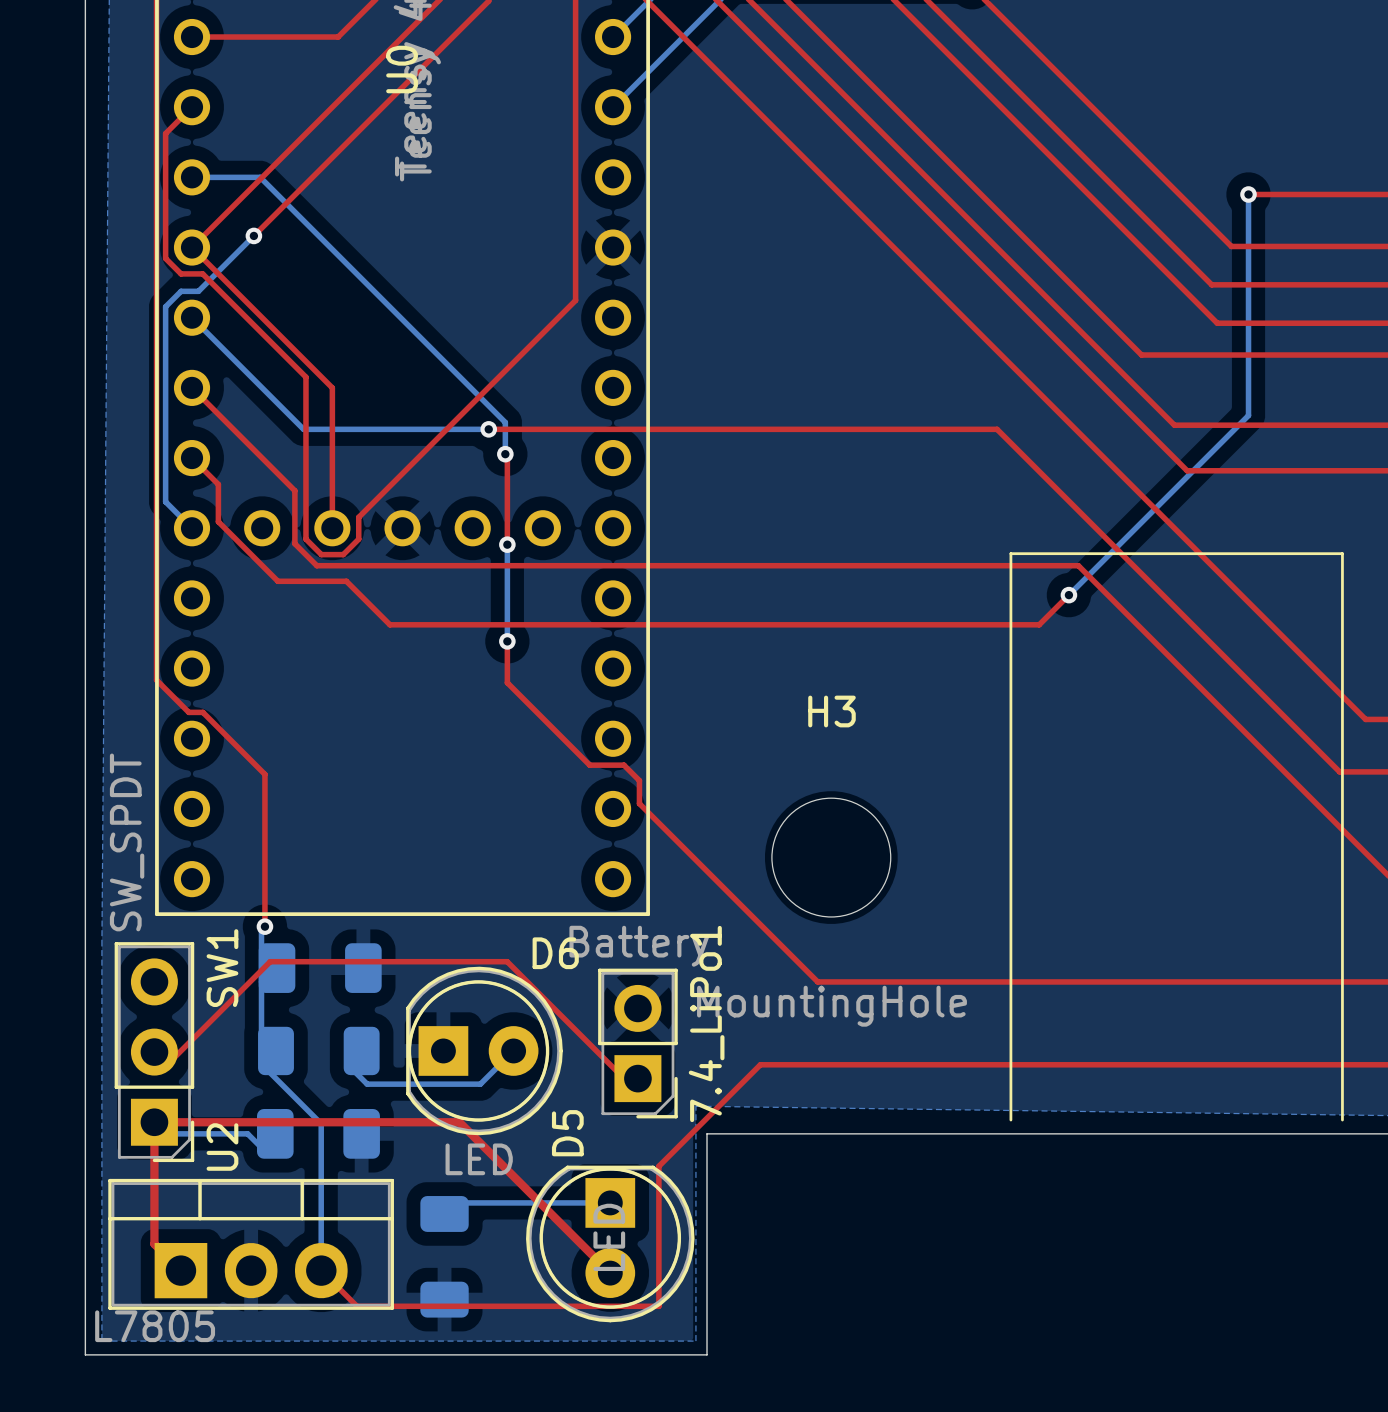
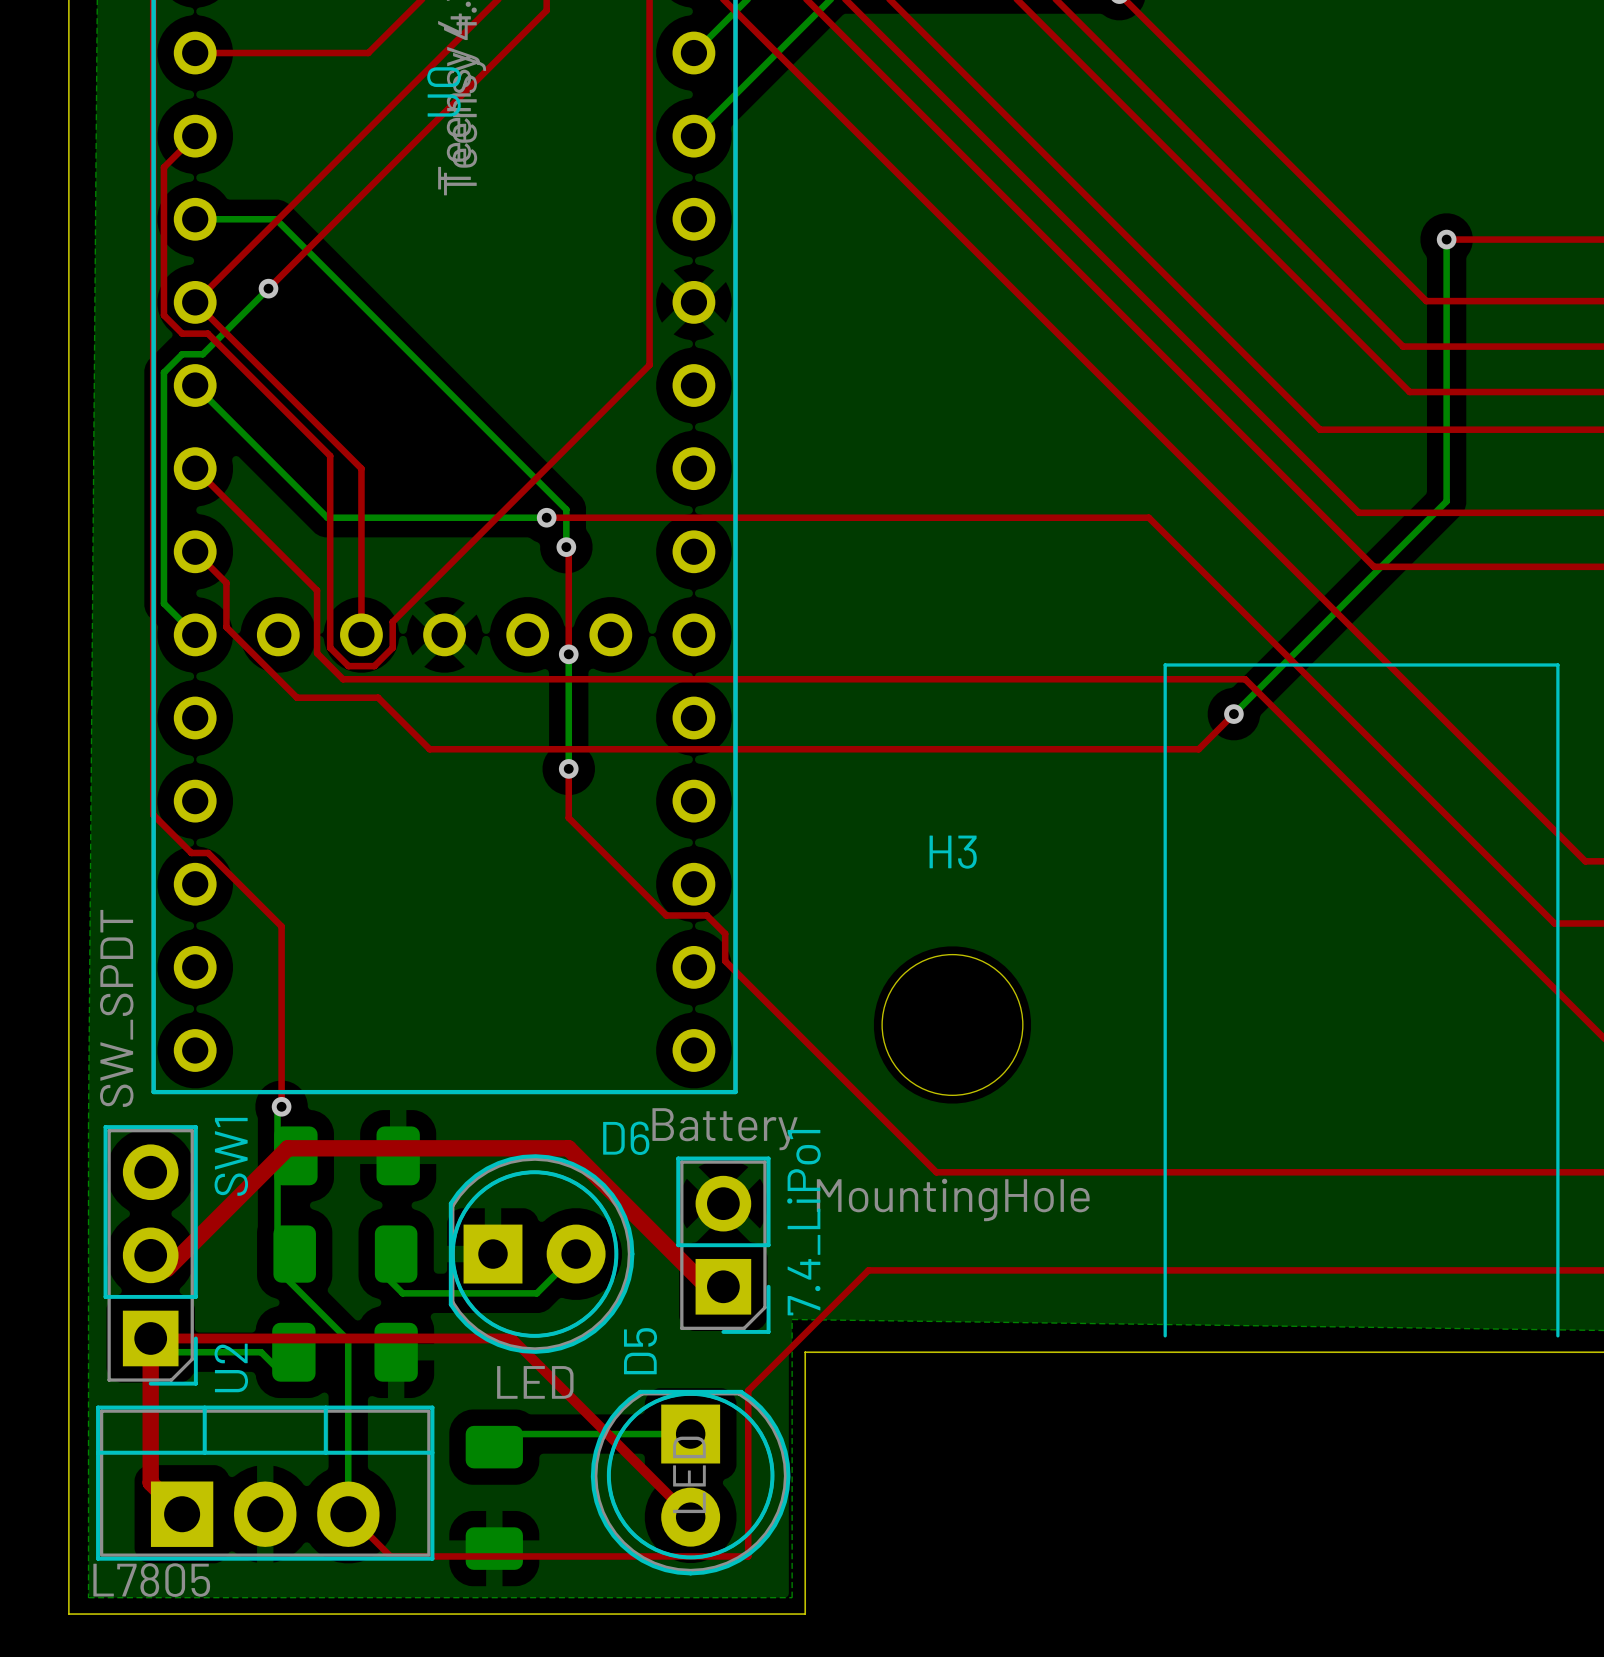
top track width: thin (168, 1063) (270, 961) (507, 961) (624, 1078) -> thick (167, 1269) (287, 1148) (568, 1148) (707, 1286)
top track width: thin (154, 1122) (154, 1244) (180, 1270) -> thick (150, 1338) (150, 1482) (182, 1514)

